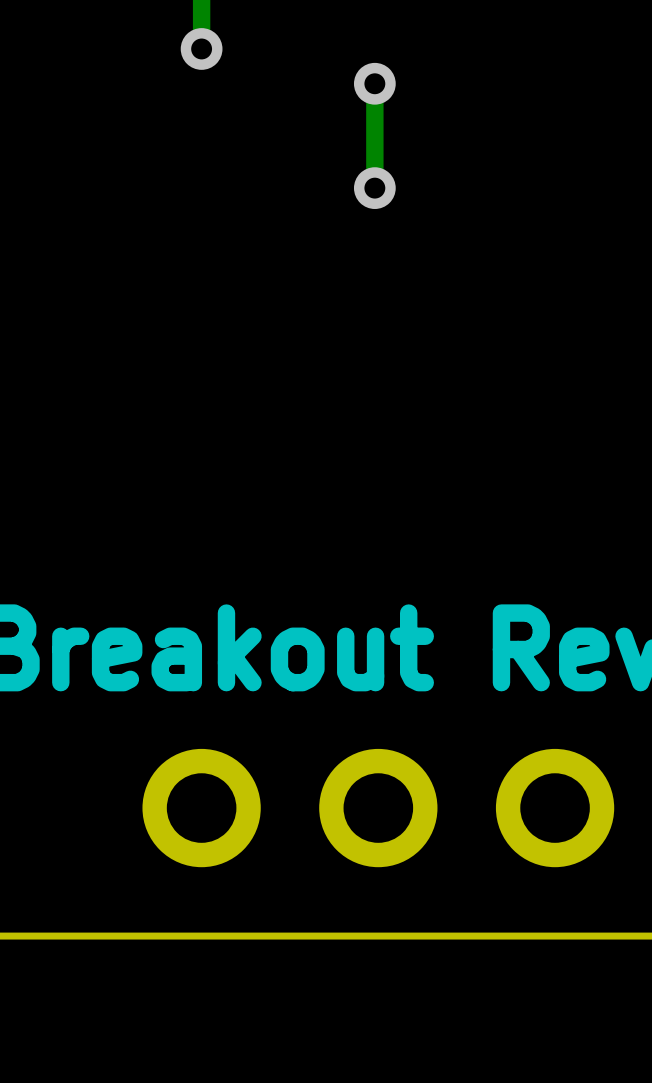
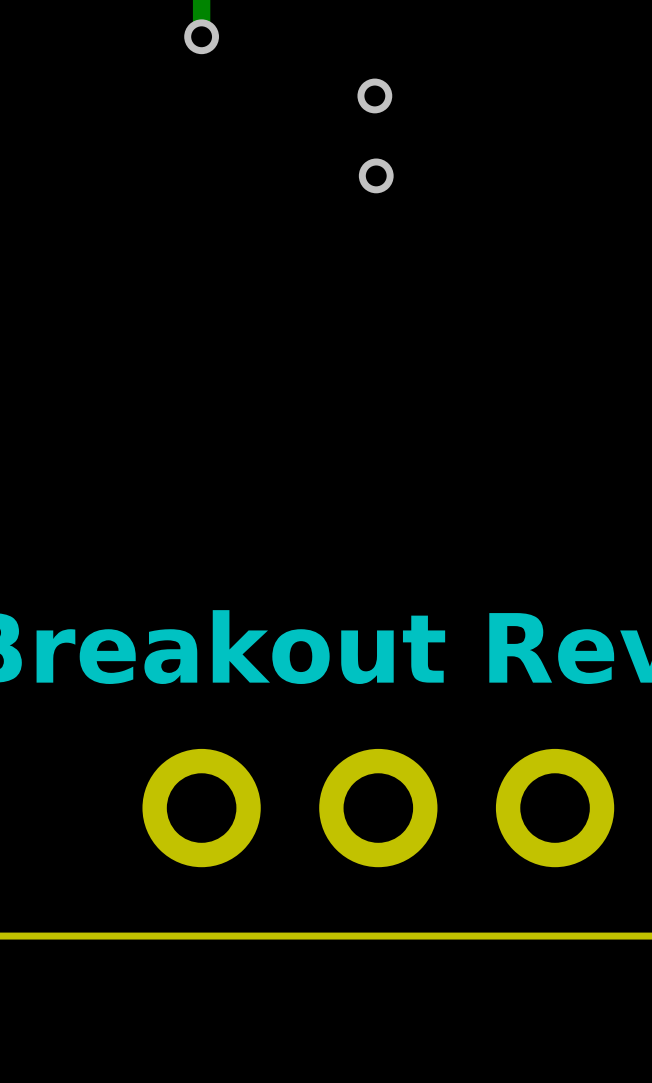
via size: [180, 28, 223, 70] -> [184, 19, 220, 55]
via size: [353, 62, 396, 105] -> [357, 78, 393, 114]
track: (374, 83) (374, 188) -> none
via size: [353, 167, 396, 209] -> [358, 158, 394, 194]

